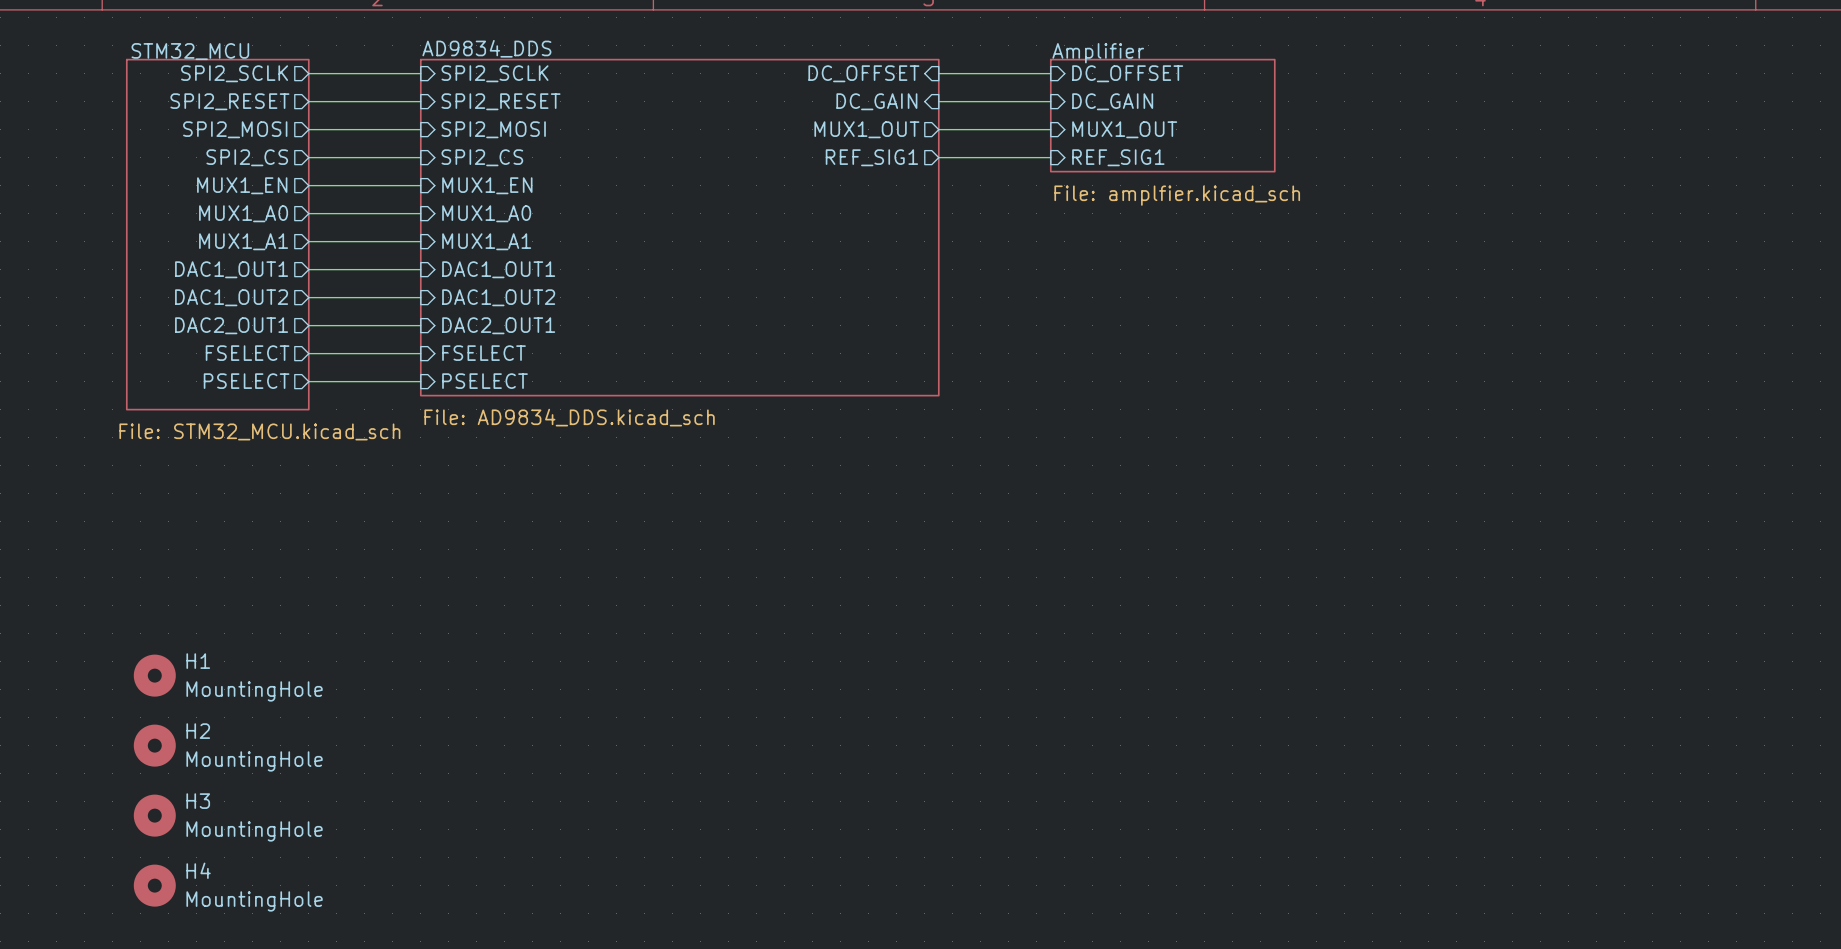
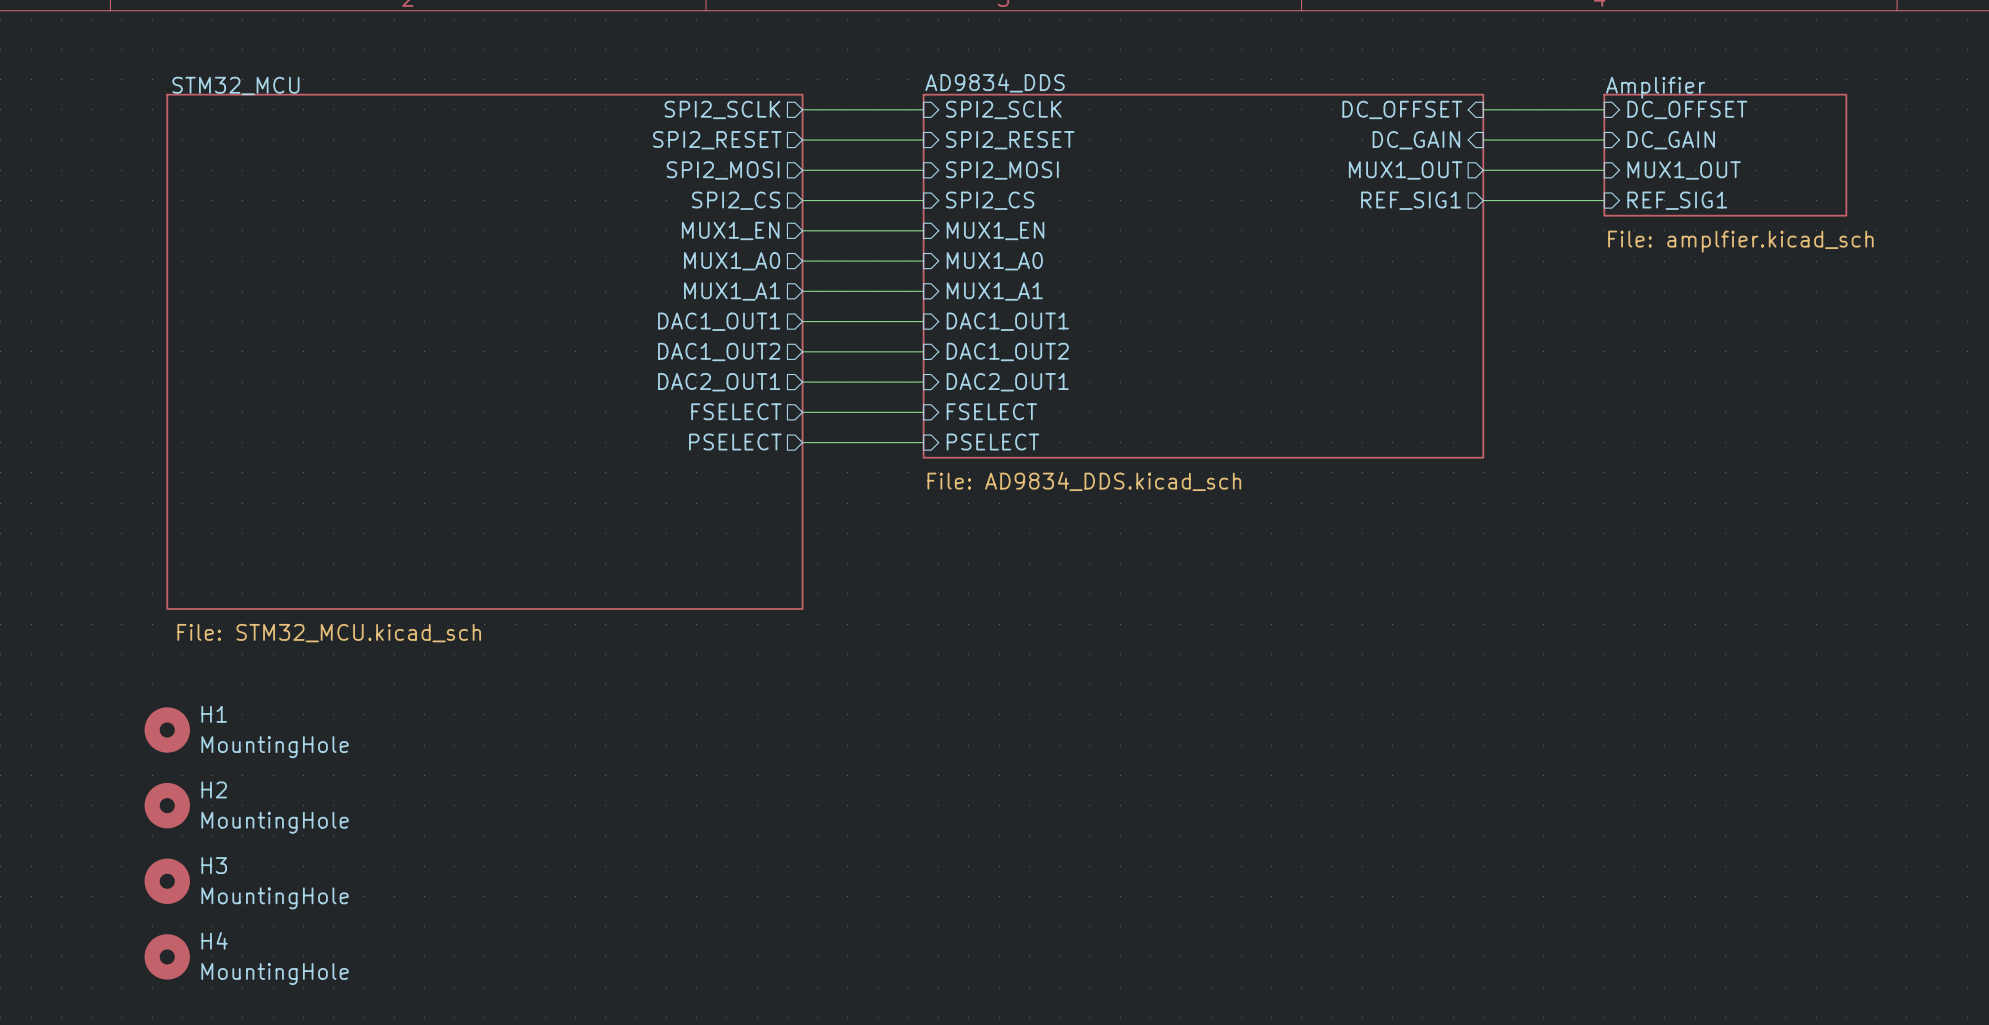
sheet STM32_MCU name position: STM32_MCU (190, 51) -> STM32_MCU (235, 85)
sheet STM32_MCU shape: [125, 58, 310, 411] -> [166, 93, 804, 610]
sheet pin: SPI2_SCLK (234, 73) -> none
wire: (308, 73) (420, 73) -> none
sheet pin: SPI2_SCLK (495, 73) -> none
sheet pin: DC_OFFSET (863, 73) -> none
wire: (938, 73) (1050, 73) -> (802, 109) (923, 109)
sheet pin: DC_OFFSET (1127, 73) -> none
sheet pin: SPI2_RESET (229, 101) -> none
wire: (308, 101) (420, 101) -> none
sheet pin: SPI2_RESET (501, 101) -> none
sheet pin: none -> SPI2_SCLK (722, 109)
sheet pin: DC_GAIN (876, 101) -> none
sheet pin: none -> SPI2_SCLK (1003, 109)
wire: (938, 101) (1050, 101) -> (802, 140) (923, 140)
sheet pin: DC_GAIN (1112, 101) -> none
sheet pin: none -> DC_OFFSET (1402, 109)
wire: none -> (1483, 109) (1604, 109)
sheet pin: none -> DC_OFFSET (1687, 109)
sheet Amplifier: File: amplfier.kicad_sch (1162, 115) -> none
sheet pin: SPI2_MOSI (235, 129) -> none
wire: (308, 129) (420, 129) -> none
sheet pin: SPI2_MOSI (493, 129) -> none
sheet pin: none -> SPI2_RESET (717, 140)
sheet pin: MUX1_OUT (866, 129) -> none
sheet pin: none -> SPI2_RESET (1010, 140)
wire: (938, 129) (1050, 129) -> (802, 170) (923, 170)
sheet pin: MUX1_OUT (1124, 129) -> none
sheet pin: none -> DC_GAIN (1416, 140)
wire: none -> (1483, 140) (1604, 140)
sheet pin: none -> DC_GAIN (1671, 140)
sheet Amplifier: none -> File: amplfier.kicad_sch (1725, 155)
sheet pin: SPI2_CS (247, 157) -> none
wire: (308, 157) (420, 157) -> none
sheet pin: SPI2_CS (482, 157) -> none
sheet pin: none -> SPI2_MOSI (723, 170)
sheet pin: REF_SIG1 (871, 157) -> none
sheet pin: none -> SPI2_MOSI (1002, 170)
wire: (938, 157) (1050, 157) -> (802, 200) (923, 200)
sheet pin: REF_SIG1 (1118, 157) -> none
sheet pin: none -> MUX1_OUT (1405, 170)
wire: none -> (1483, 170) (1604, 170)
sheet pin: none -> MUX1_OUT (1684, 170)
sheet pin: MUX1_EN (242, 185) -> none
wire: (308, 185) (420, 185) -> none
sheet pin: MUX1_EN (487, 185) -> none
sheet pin: none -> SPI2_CS (736, 200)
sheet pin: none -> SPI2_CS (990, 200)
sheet pin: none -> REF_SIG1 (1411, 200)
wire: none -> (1483, 200) (1604, 200)
sheet pin: none -> REF_SIG1 (1677, 200)
sheet pin: MUX1_A0 (243, 213) -> none
wire: (308, 213) (420, 213) -> none
sheet pin: MUX1_A0 (486, 213) -> none
sheet pin: none -> MUX1_EN (730, 230)
wire: none -> (802, 230) (923, 230)
sheet pin: none -> MUX1_EN (995, 230)
sheet AD9834_DDS position: (679, 227) -> (1203, 276)
sheet pin: MUX1_A1 (243, 241) -> none
wire: (308, 241) (420, 241) -> none
sheet pin: MUX1_A1 (486, 241) -> none
sheet pin: none -> MUX1_A0 (732, 261)
wire: none -> (802, 261) (923, 261)
sheet pin: none -> MUX1_A0 (994, 261)
sheet pin: DAC1_OUT1 (231, 269) -> none
wire: (308, 269) (420, 269) -> none
sheet pin: DAC1_OUT1 (498, 269) -> none
sheet pin: none -> MUX1_A1 (732, 291)
wire: none -> (802, 291) (923, 291)
sheet pin: none -> MUX1_A1 (994, 291)
sheet pin: DAC1_OUT2 (231, 297) -> none
wire: (308, 297) (420, 297) -> none
sheet pin: DAC1_OUT2 (498, 297) -> none
sheet pin: none -> DAC1_OUT1 (719, 321)
wire: none -> (802, 321) (923, 321)
sheet pin: none -> DAC1_OUT1 (1007, 321)
sheet pin: DAC2_OUT1 (231, 325) -> none
wire: (308, 325) (420, 325) -> none
sheet pin: DAC2_OUT1 (498, 325) -> none
sheet pin: none -> DAC1_OUT2 (719, 351)
wire: none -> (802, 351) (923, 351)
sheet pin: none -> DAC1_OUT2 (1007, 351)
sheet pin: FSELECT (247, 353) -> none
wire: (308, 353) (420, 353) -> none
sheet pin: FSELECT (484, 353) -> none
sheet pin: none -> DAC2_OUT1 (719, 382)
wire: none -> (802, 382) (923, 382)
sheet pin: none -> DAC2_OUT1 (1007, 382)
sheet pin: PSELECT (246, 381) -> none
wire: (308, 381) (420, 381) -> none
sheet pin: PSELECT (485, 381) -> none
sheet pin: none -> FSELECT (736, 411)
wire: none -> (802, 412) (923, 412)
sheet pin: none -> FSELECT (991, 411)
sheet pin: none -> PSELECT (735, 442)
wire: none -> (802, 442) (923, 442)
sheet pin: none -> PSELECT (992, 442)
sheet STM32_MCU value position: File: STM32_MCU.kicad_sch (259, 431) -> File: STM32_MCU.kicad_sch (329, 633)

